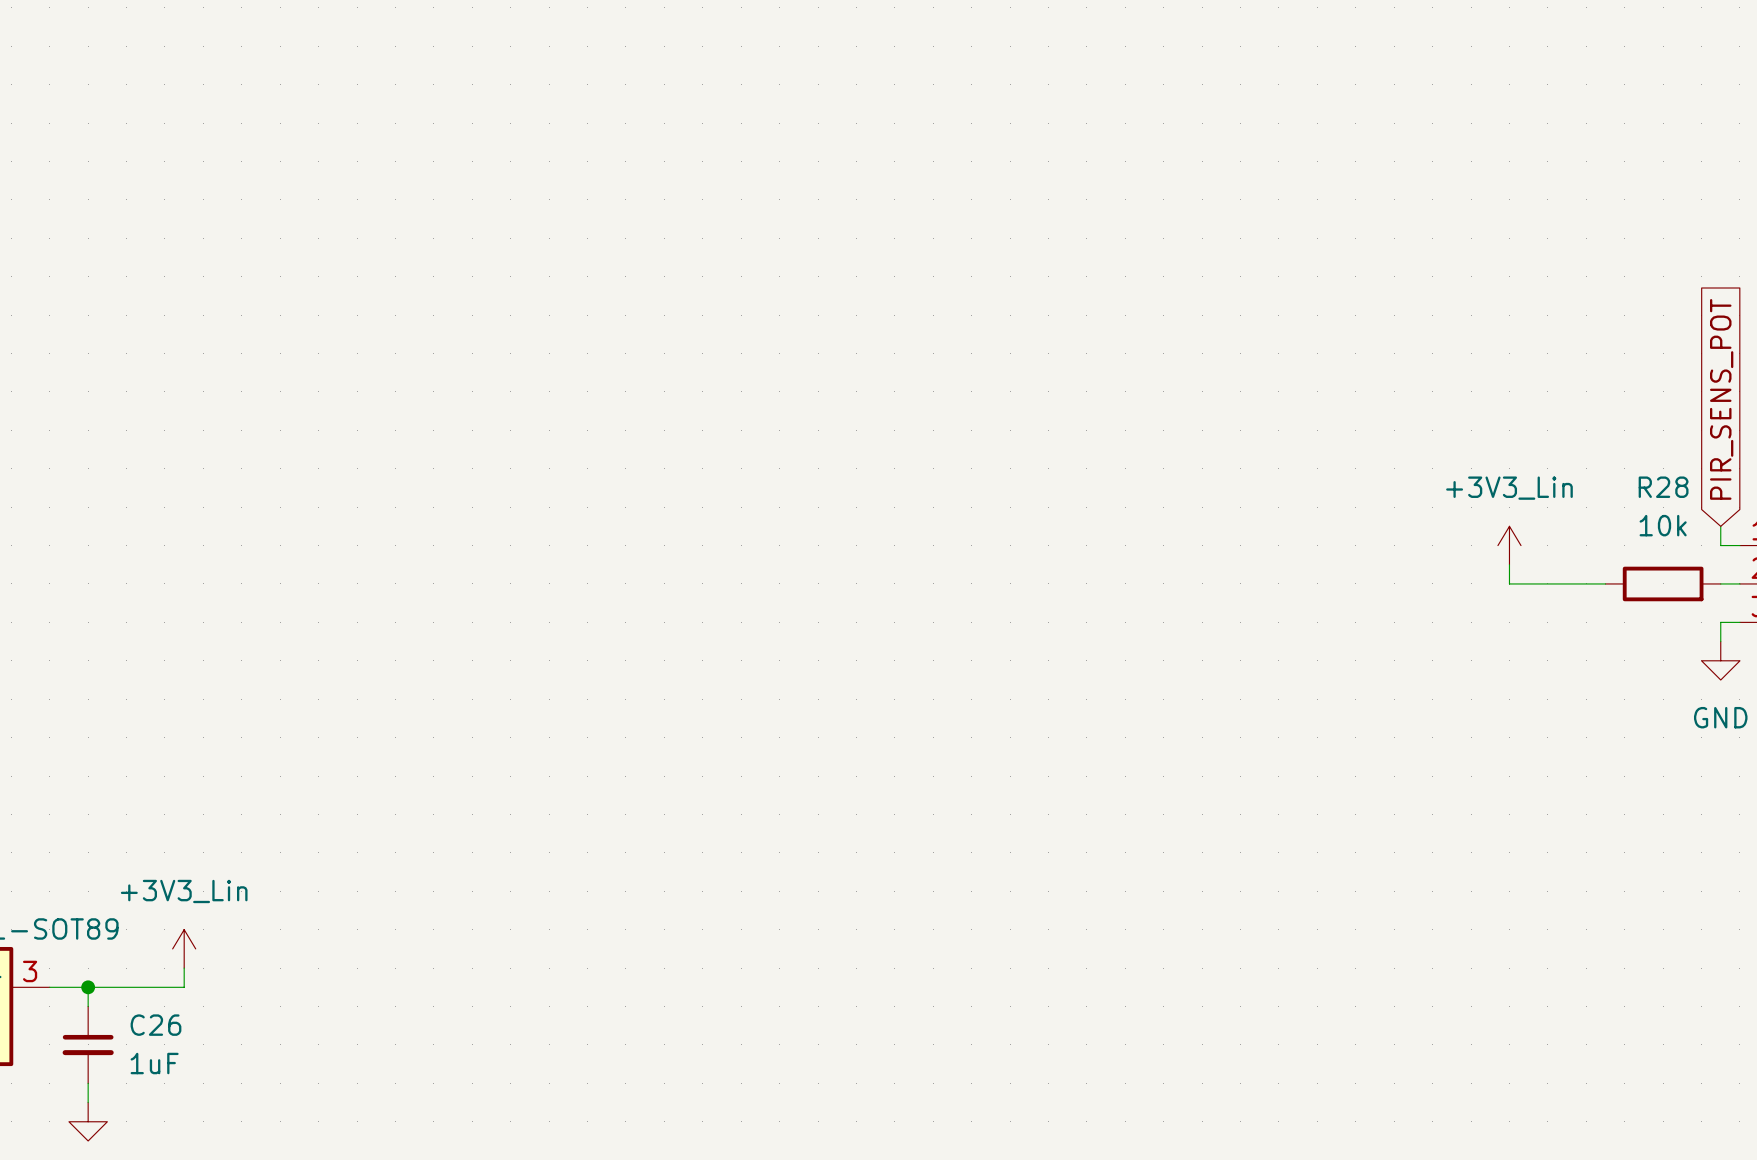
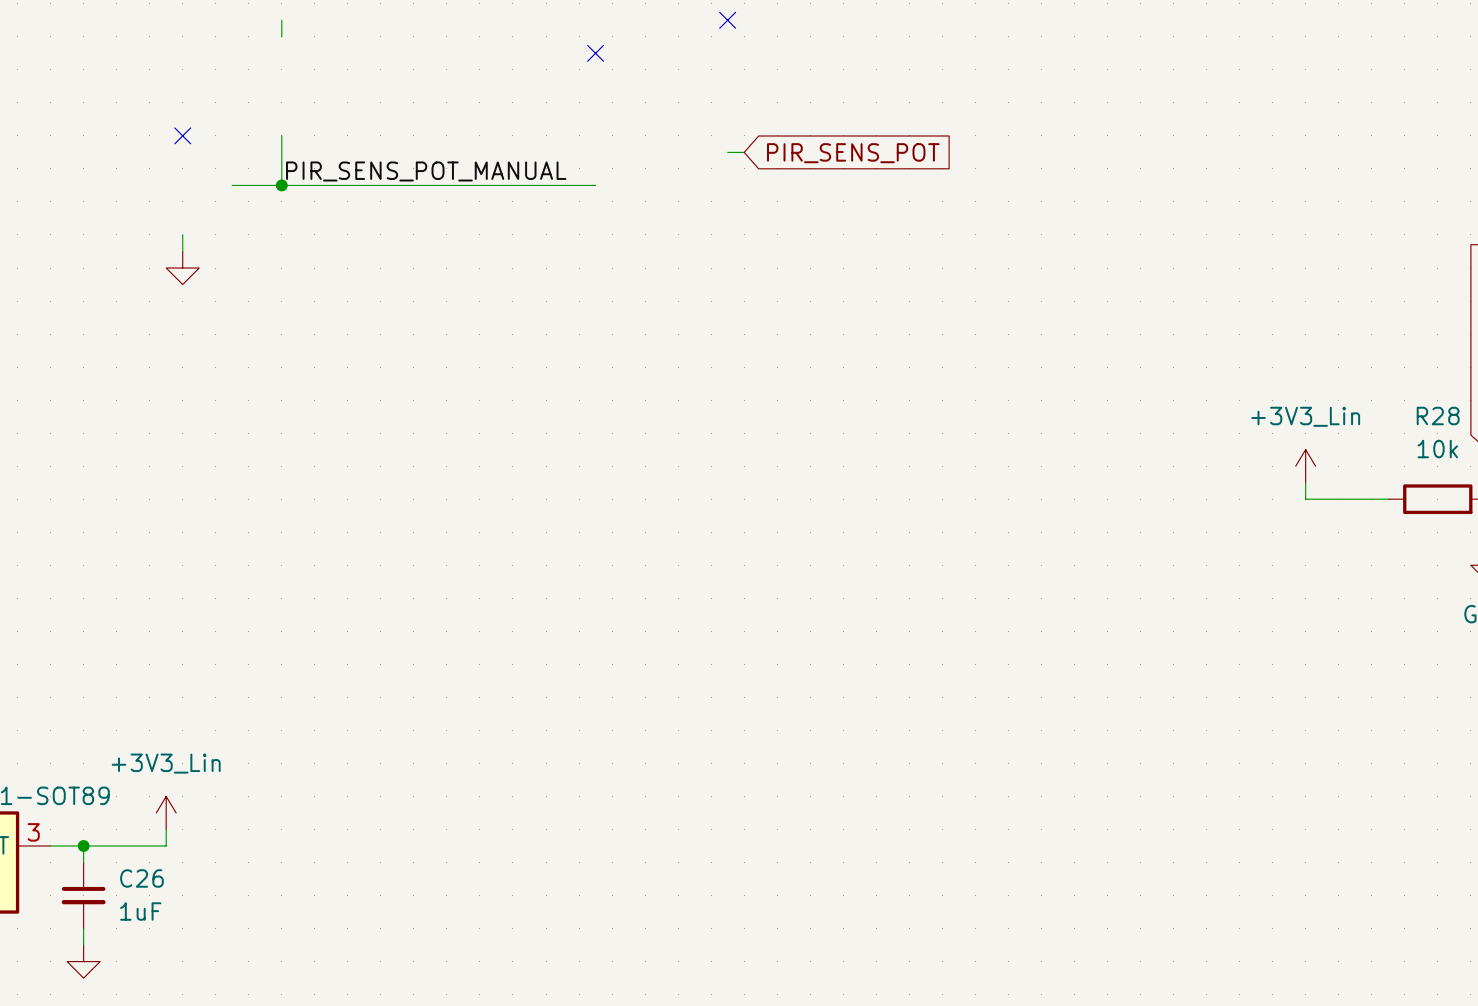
wire: none -> (281, 20) (281, 36)
no-connect mark: none -> (727, 20)
no-connect mark: none -> (595, 53)
no-connect mark: none -> (182, 135)
wire: none -> (281, 135) (281, 185)
wire: none -> (727, 152) (744, 152)
global label: none -> PIR_SENS_POT (853, 153)
label: none -> PIR_SENS_POT_MANUAL (426, 171)
wire: none -> (232, 185) (595, 185)
junction: none -> (281, 185)
wire: none -> (182, 234) (182, 251)
power symbol: none -> (182, 268)

